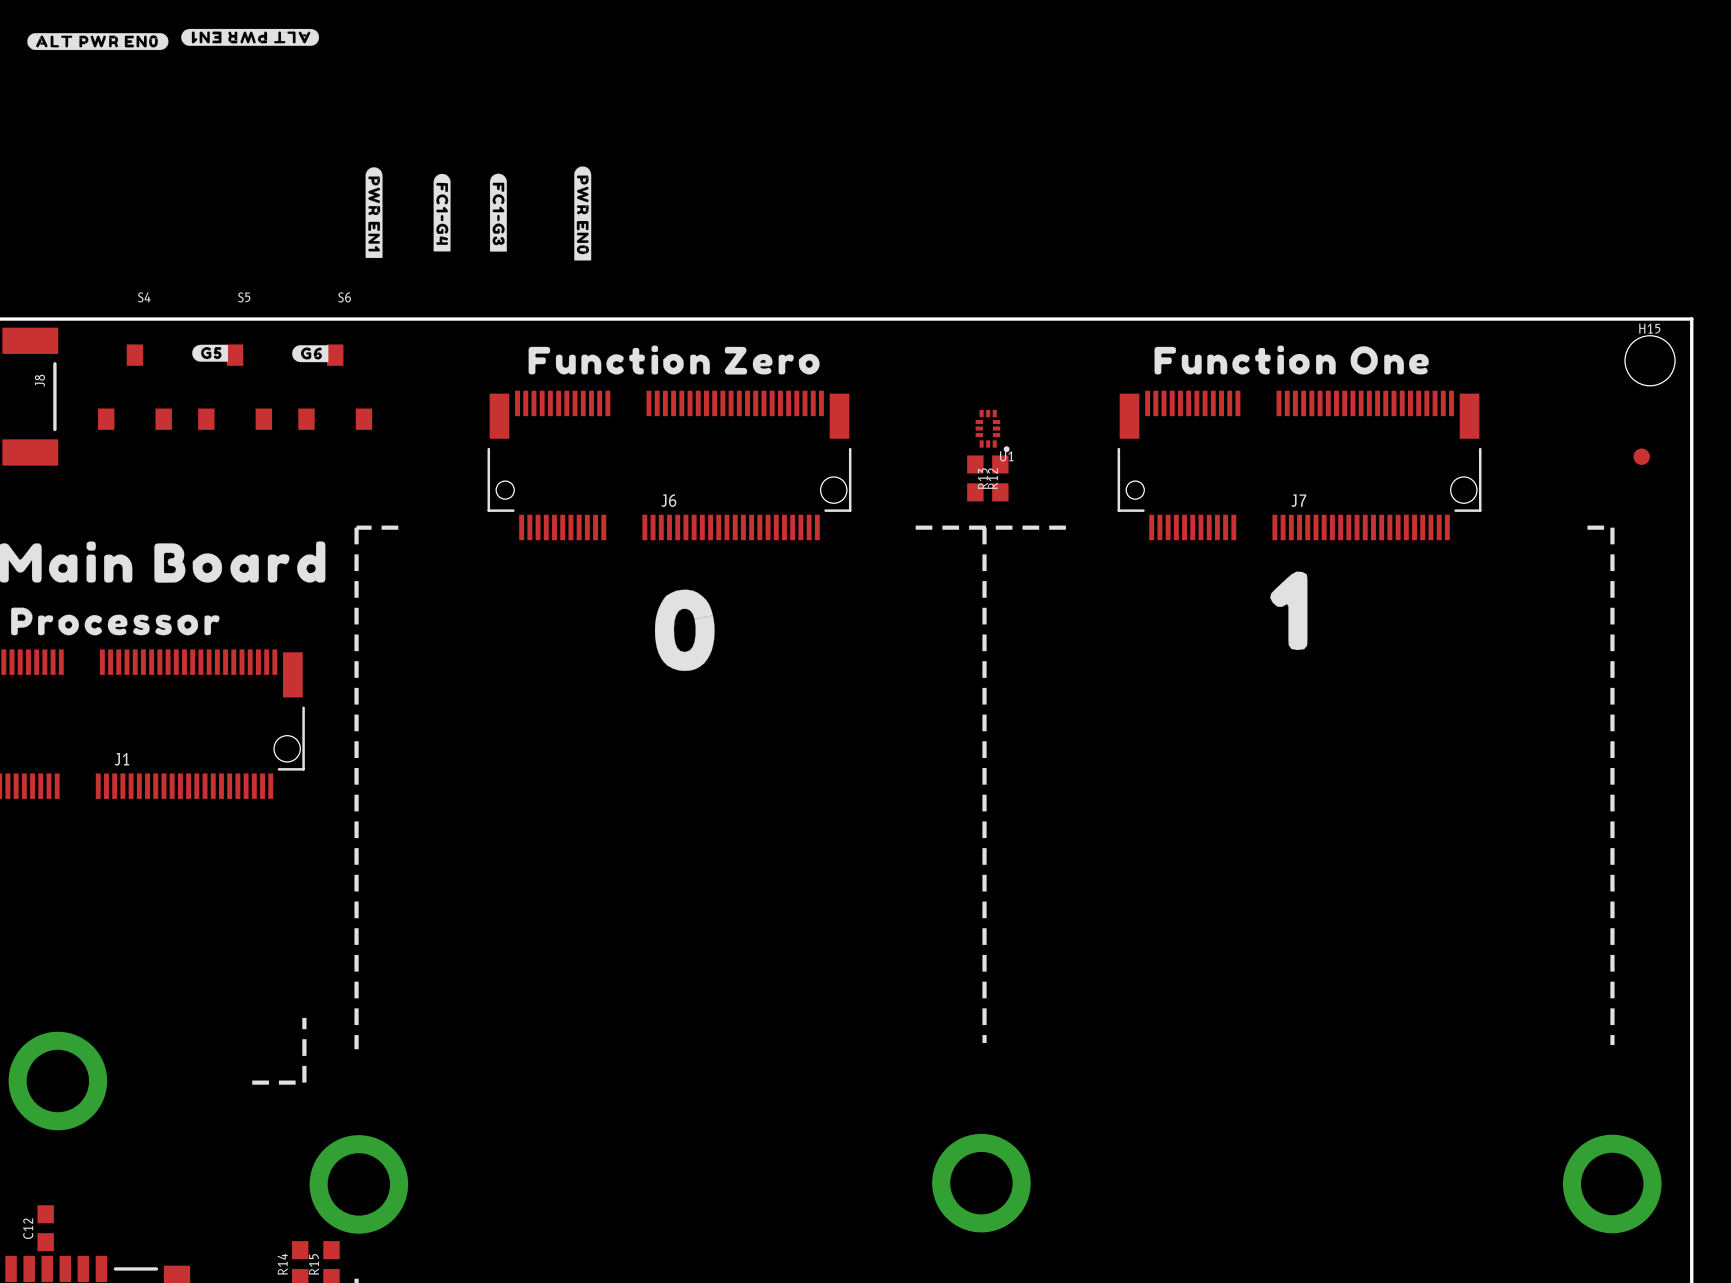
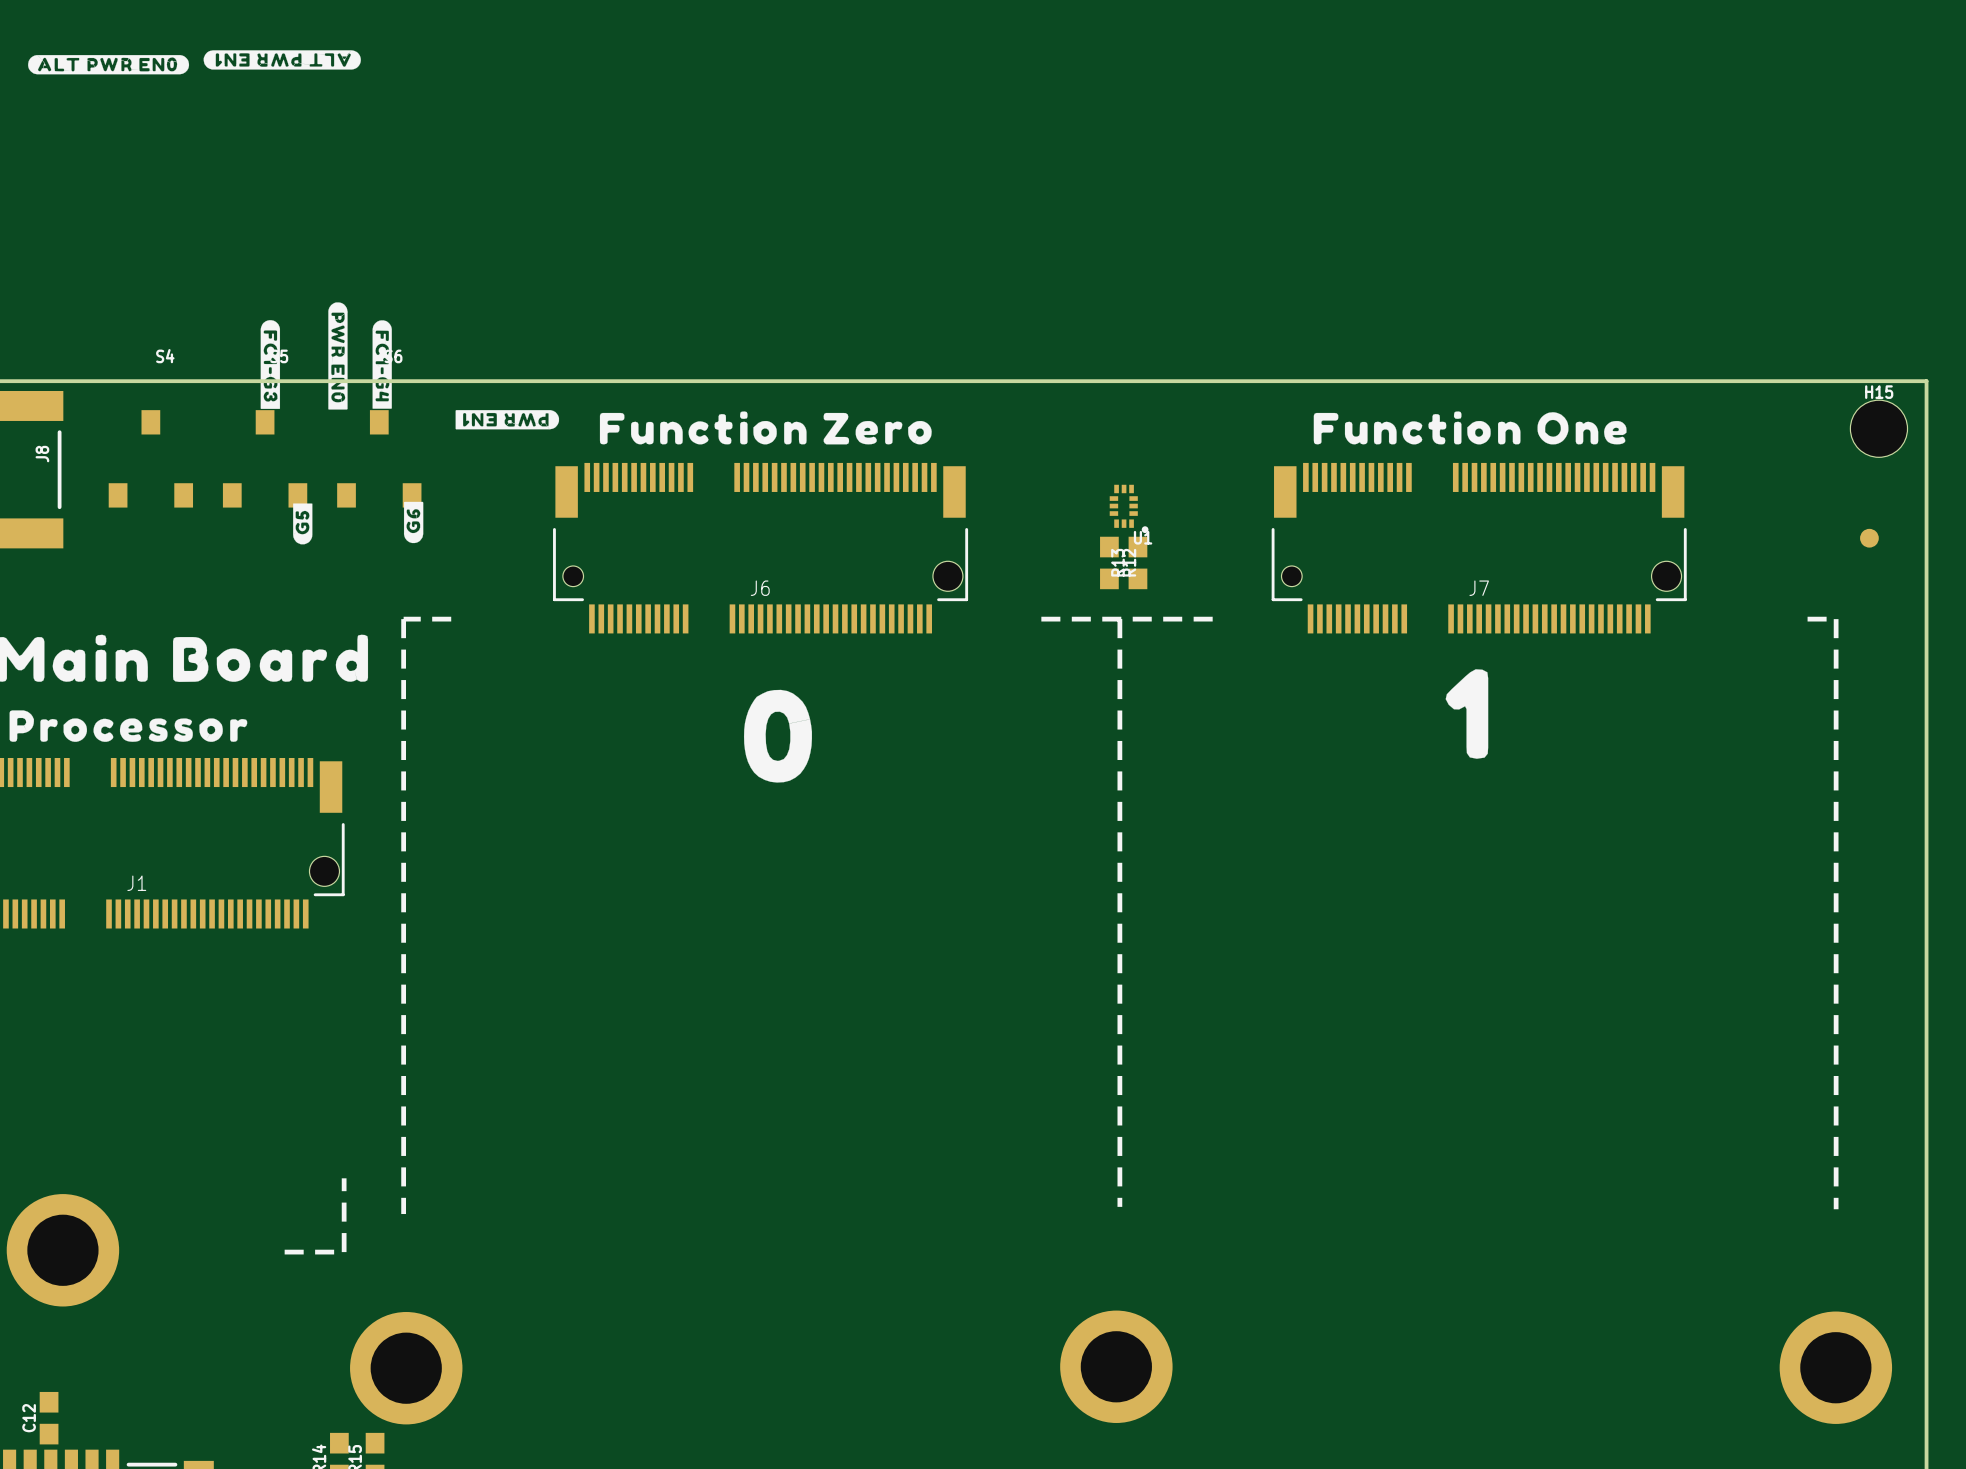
drawing: [365, 167, 383, 259] -> none
drawing position: (442, 212) -> (382, 364)
drawing position: (498, 212) -> (270, 364)
drawing position: (582, 213) -> (337, 355)
drawing: [192, 344, 229, 362] -> none
drawing: none -> [455, 410, 560, 430]
drawing: [292, 345, 329, 363] -> none
drawing: none -> [403, 501, 424, 544]
drawing: none -> [293, 503, 313, 545]

